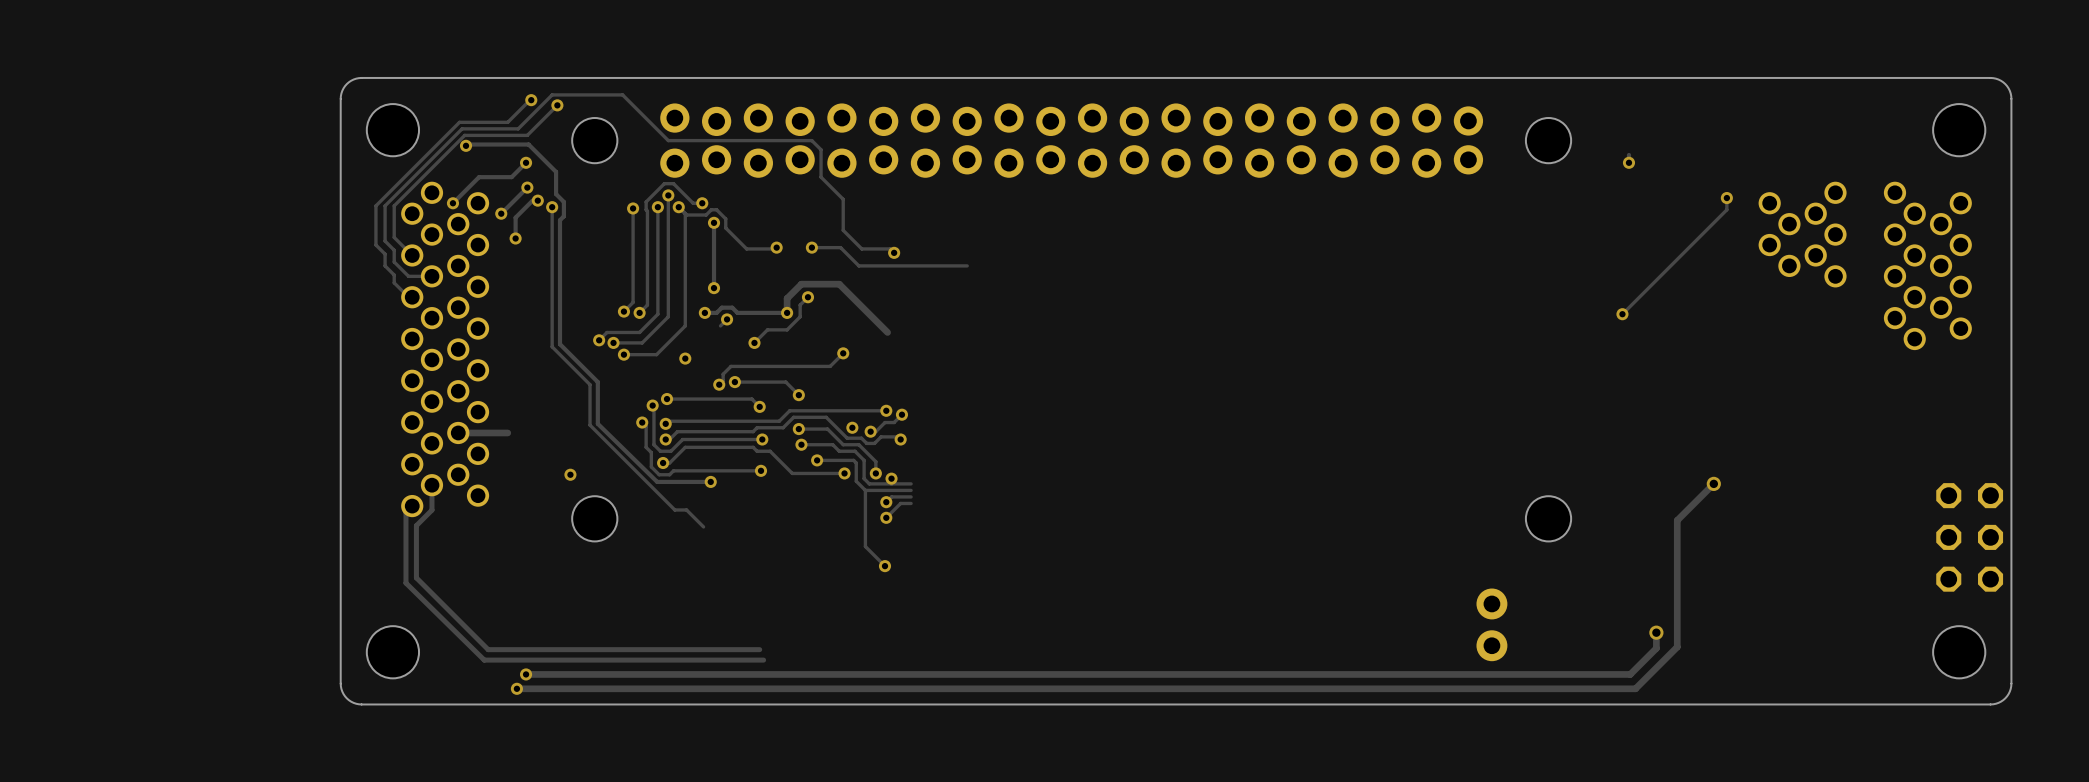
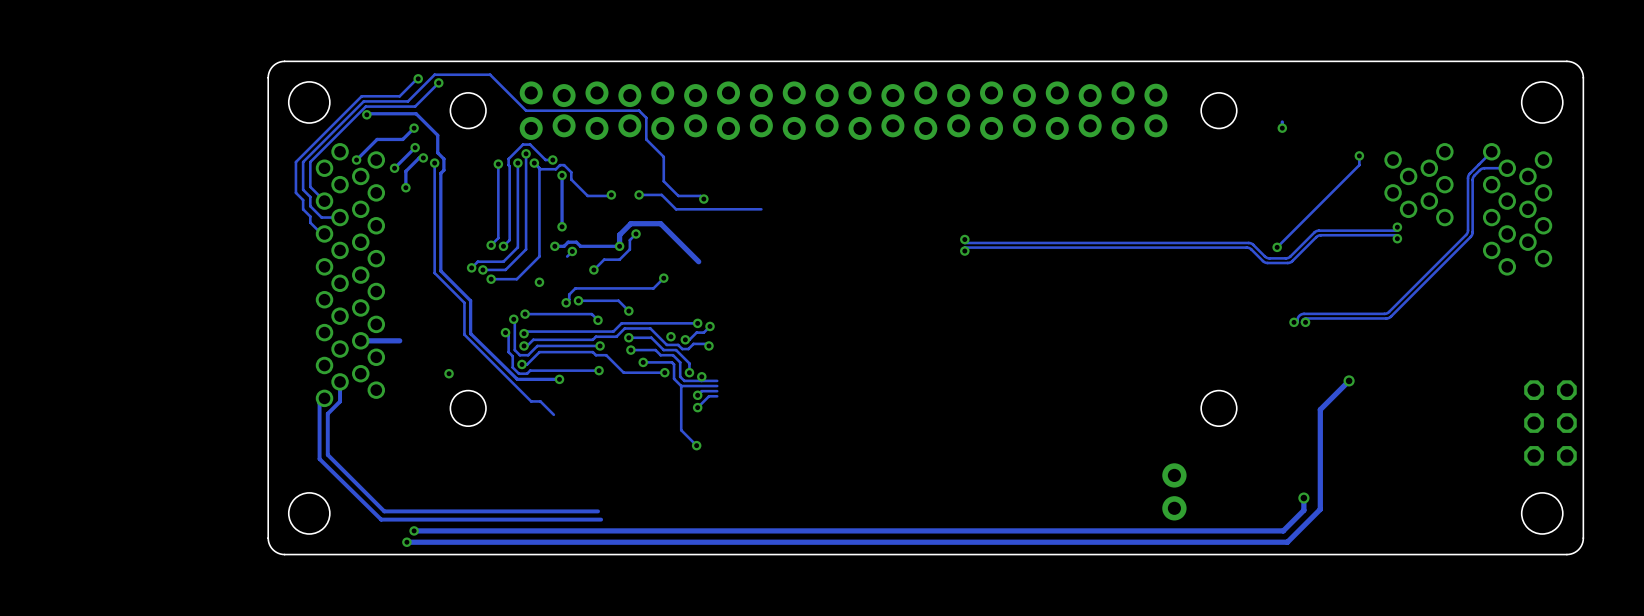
track: none -> (1491, 151) (1468, 176) (1466, 233) (1388, 312) (1303, 313) (1298, 316) (1297, 322) (1294, 322)
track: none -> (1507, 168) (1483, 168) (1474, 175) (1471, 235) (1390, 316) (1305, 318) (1302, 321) (1305, 322)
track: none -> (1397, 227) (1397, 230) (1317, 230) (1289, 256) (1285, 258) (1267, 257) (1249, 243) (964, 242) (964, 239)
via: none -> (1397, 227)
track: none -> (1397, 238) (1397, 235) (1319, 235) (1291, 261) (1287, 262) (1265, 262) (1246, 247) (964, 247) (964, 251)
via: none -> (1397, 238)
via: none -> (964, 239)
via: none -> (964, 251)
via: none -> (1294, 322)
via: none -> (1305, 322)

